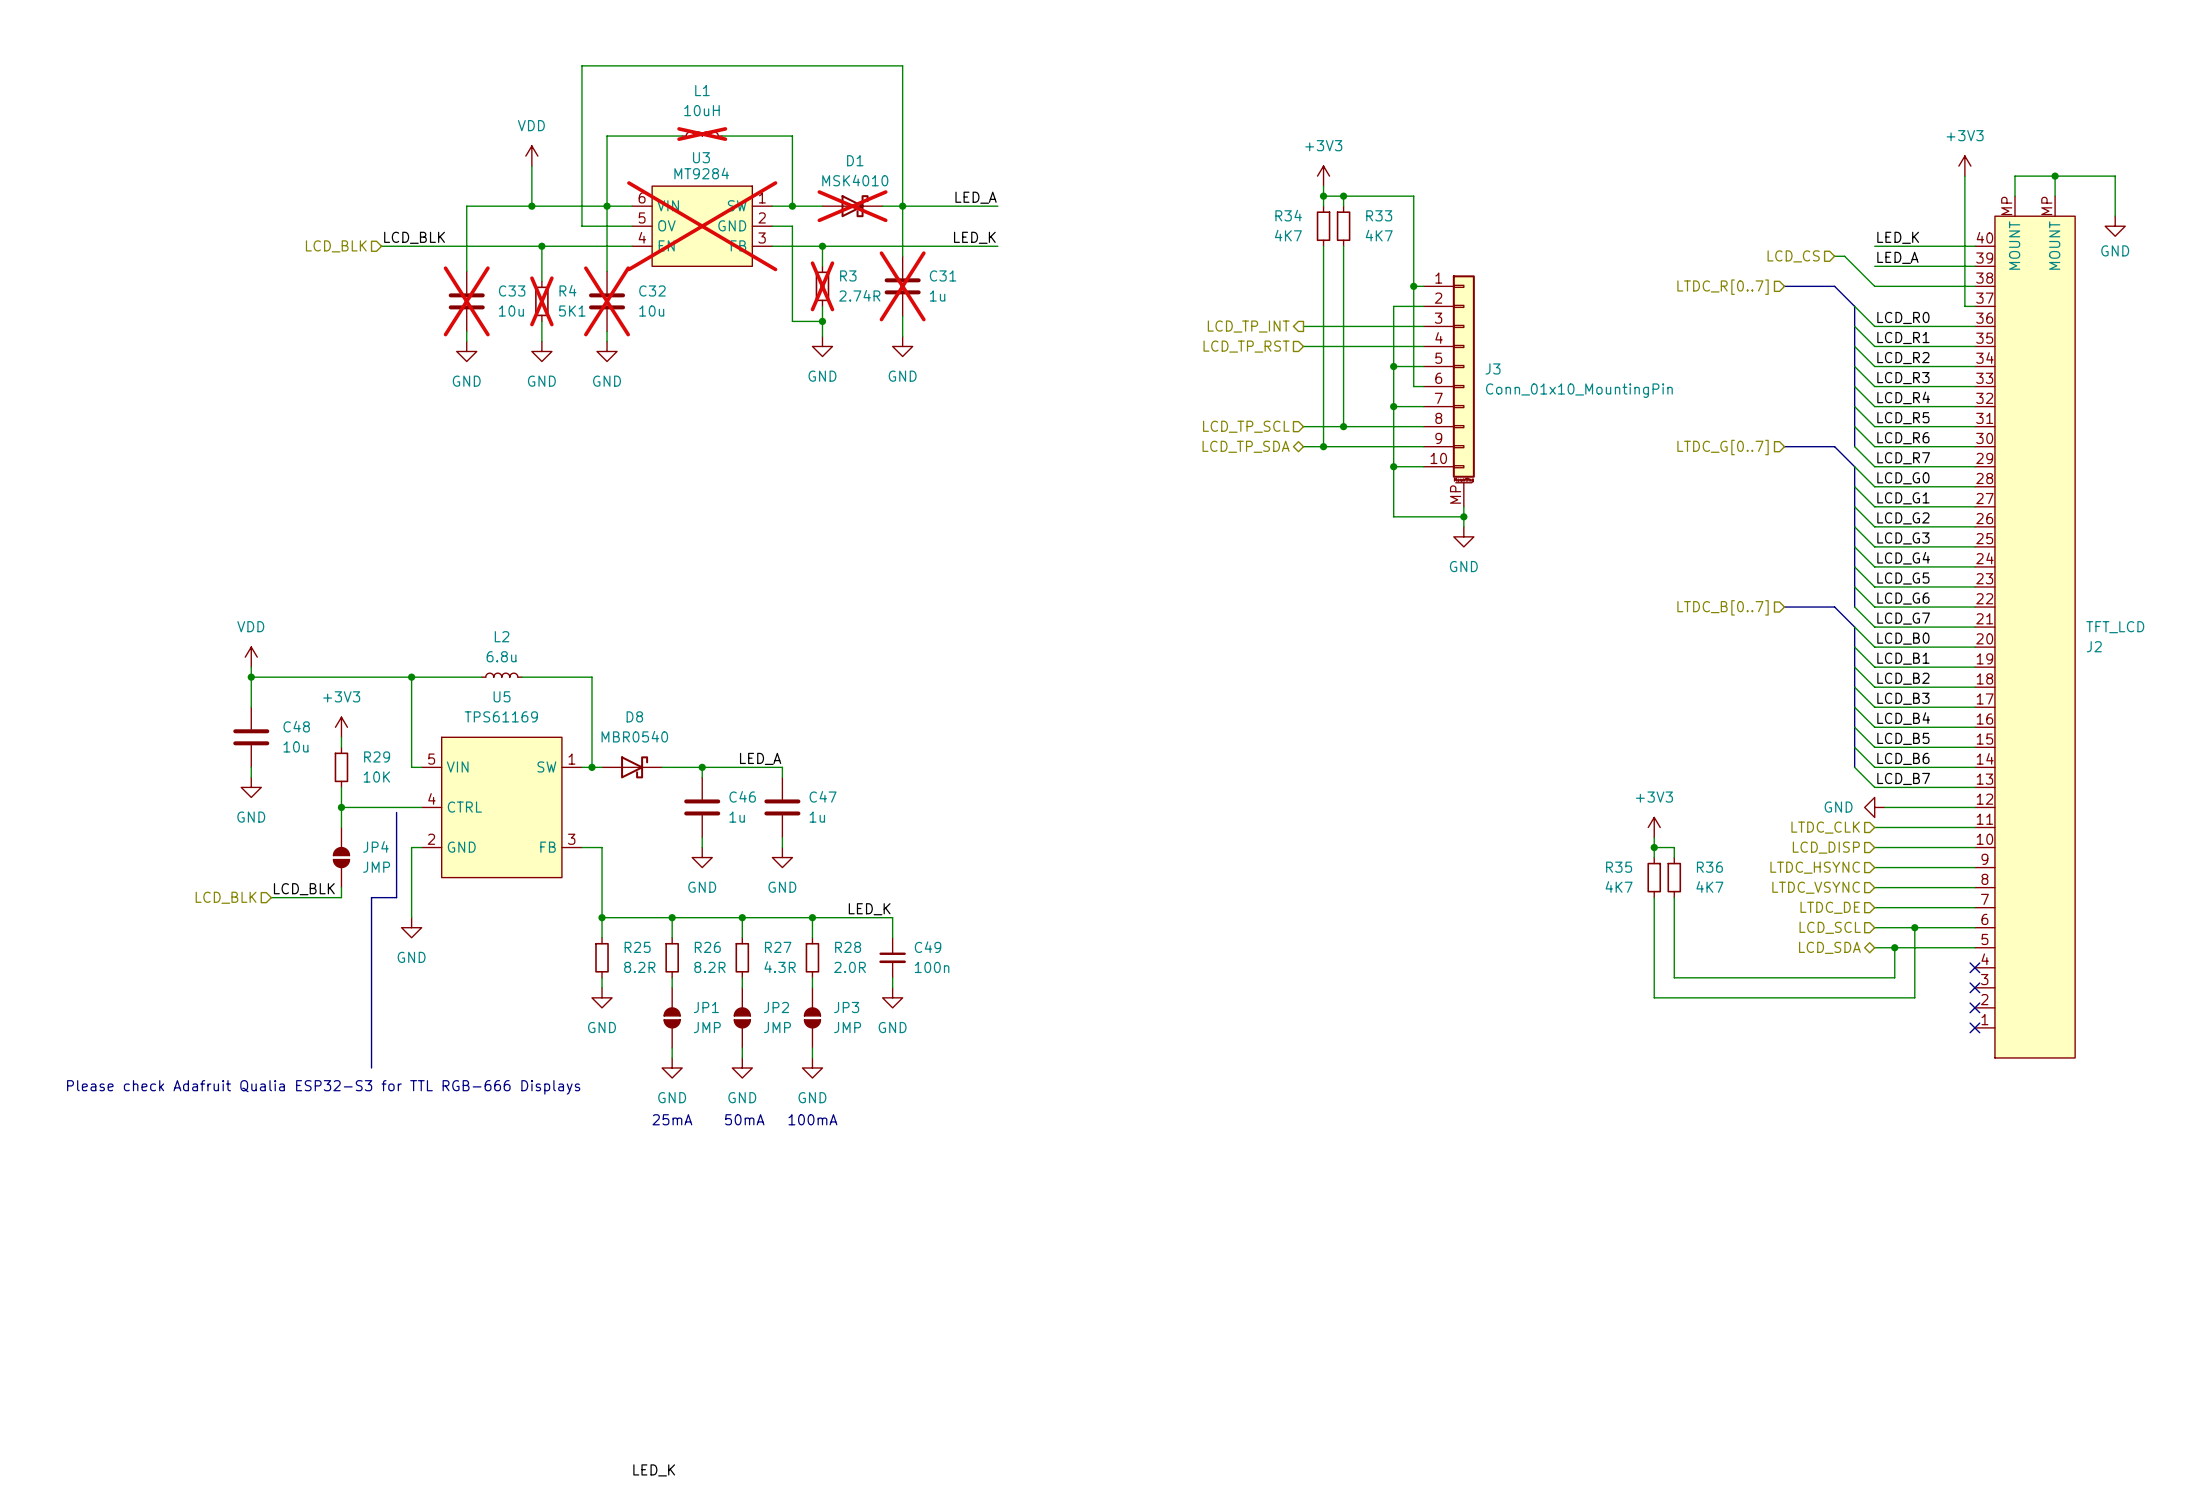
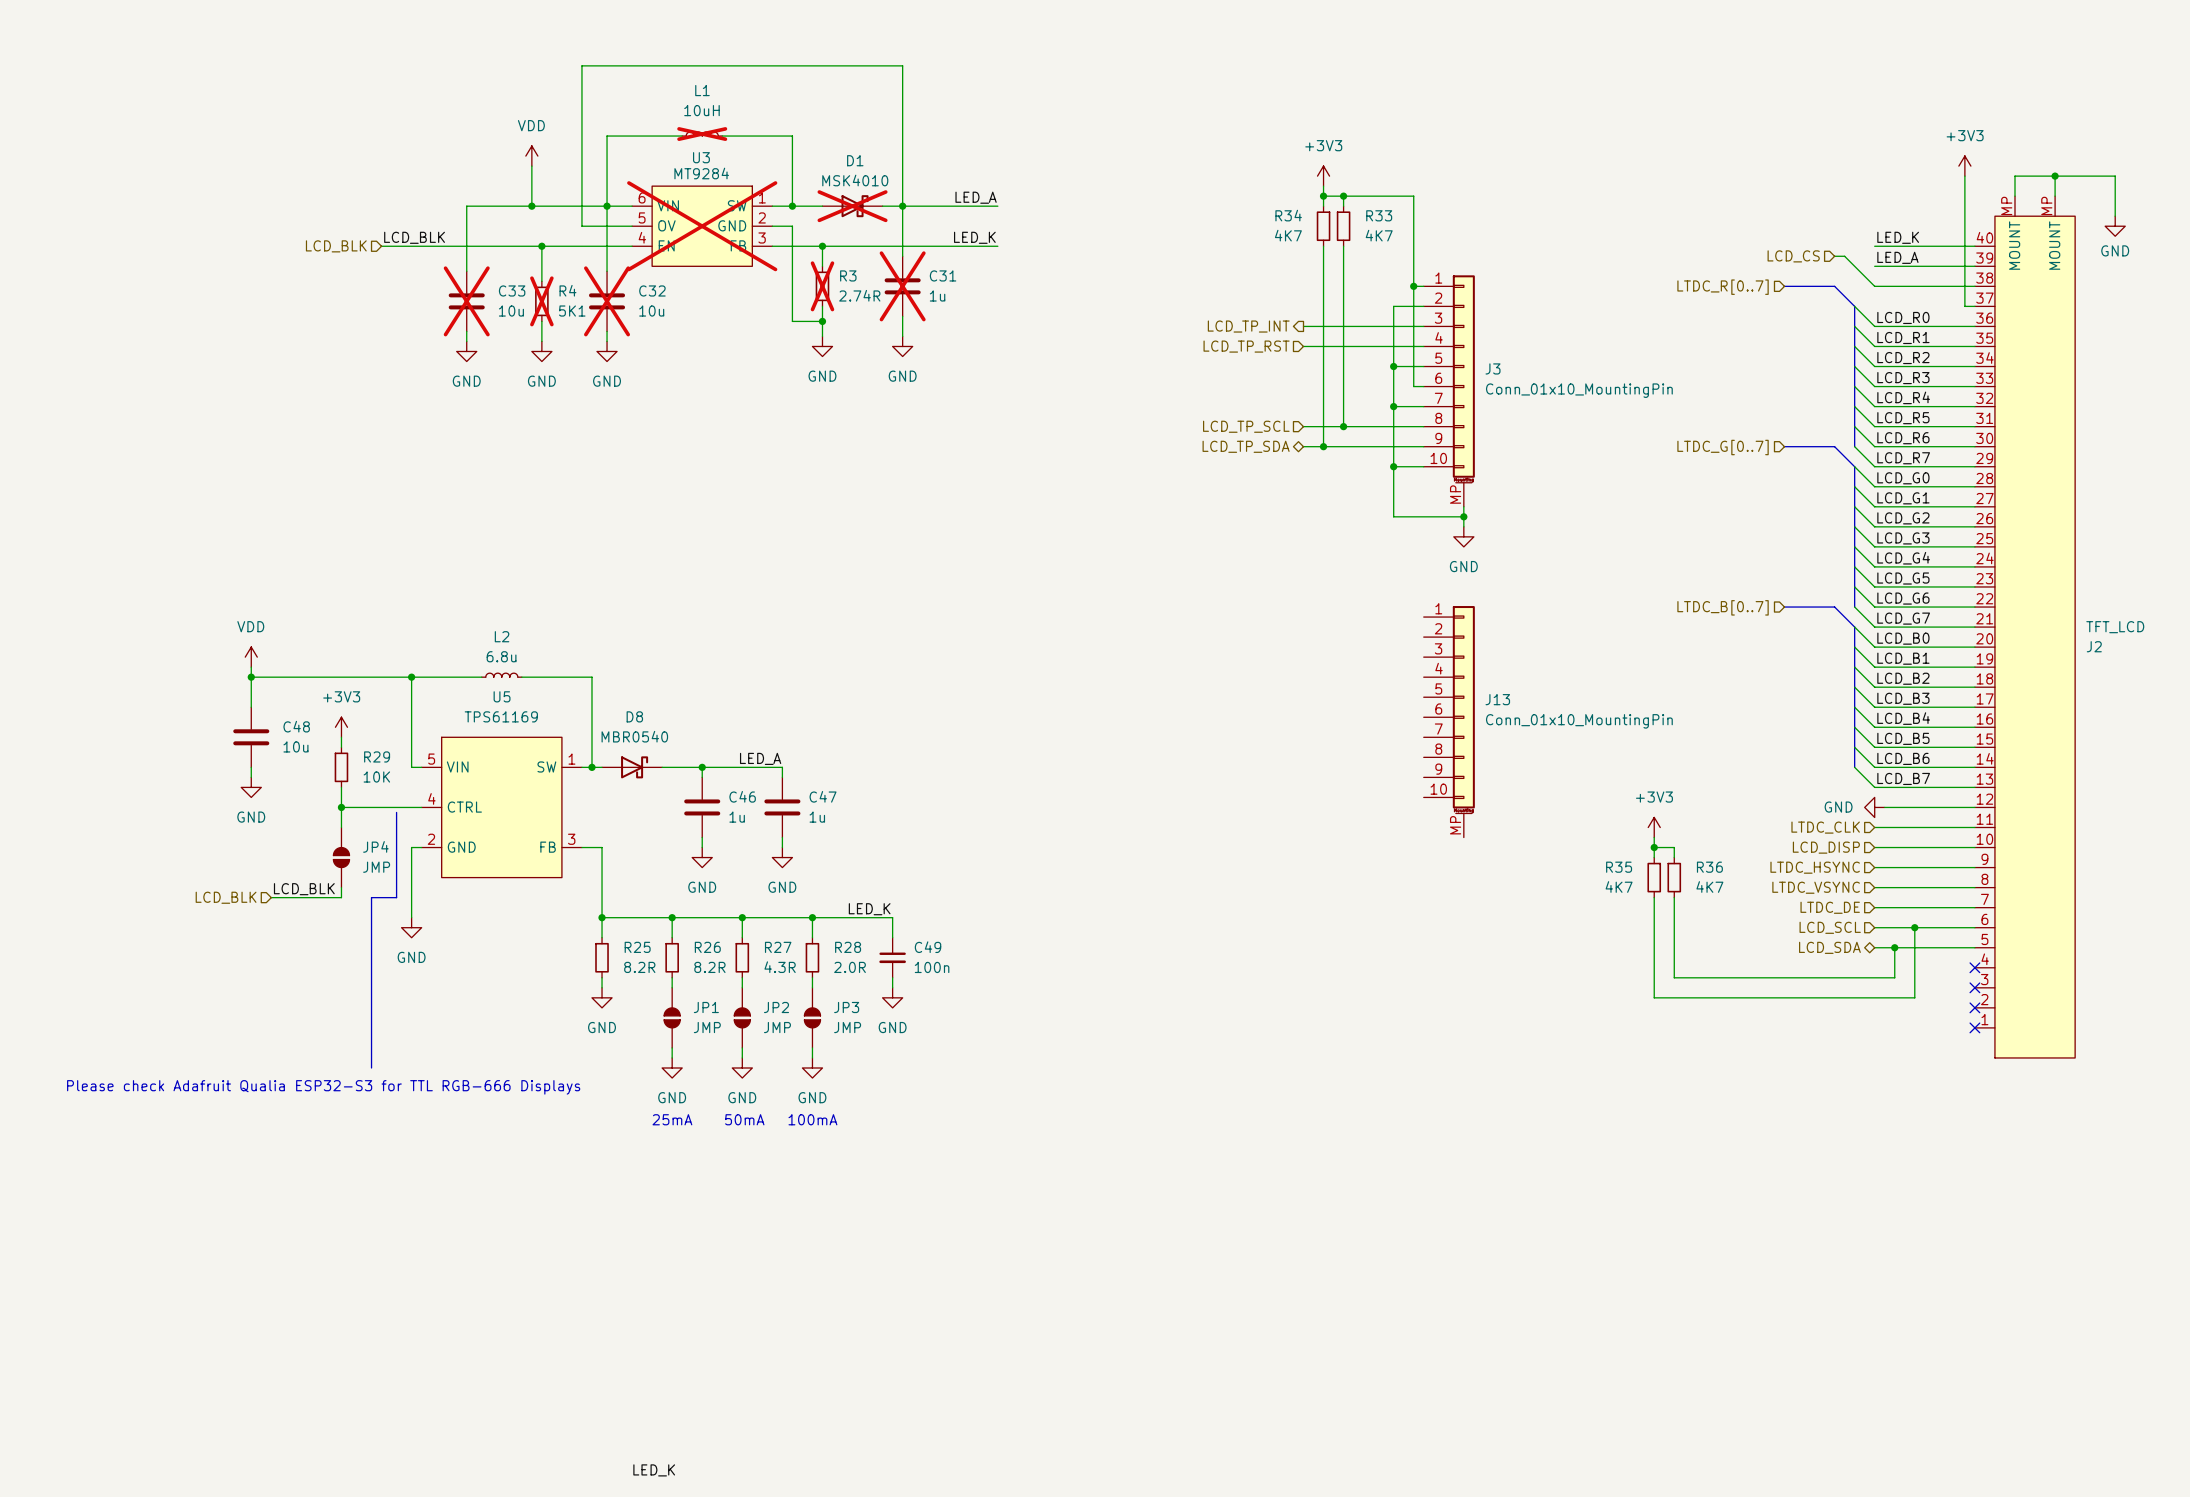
J13: none -> Conn_01x10_MountingPin (1449, 721)

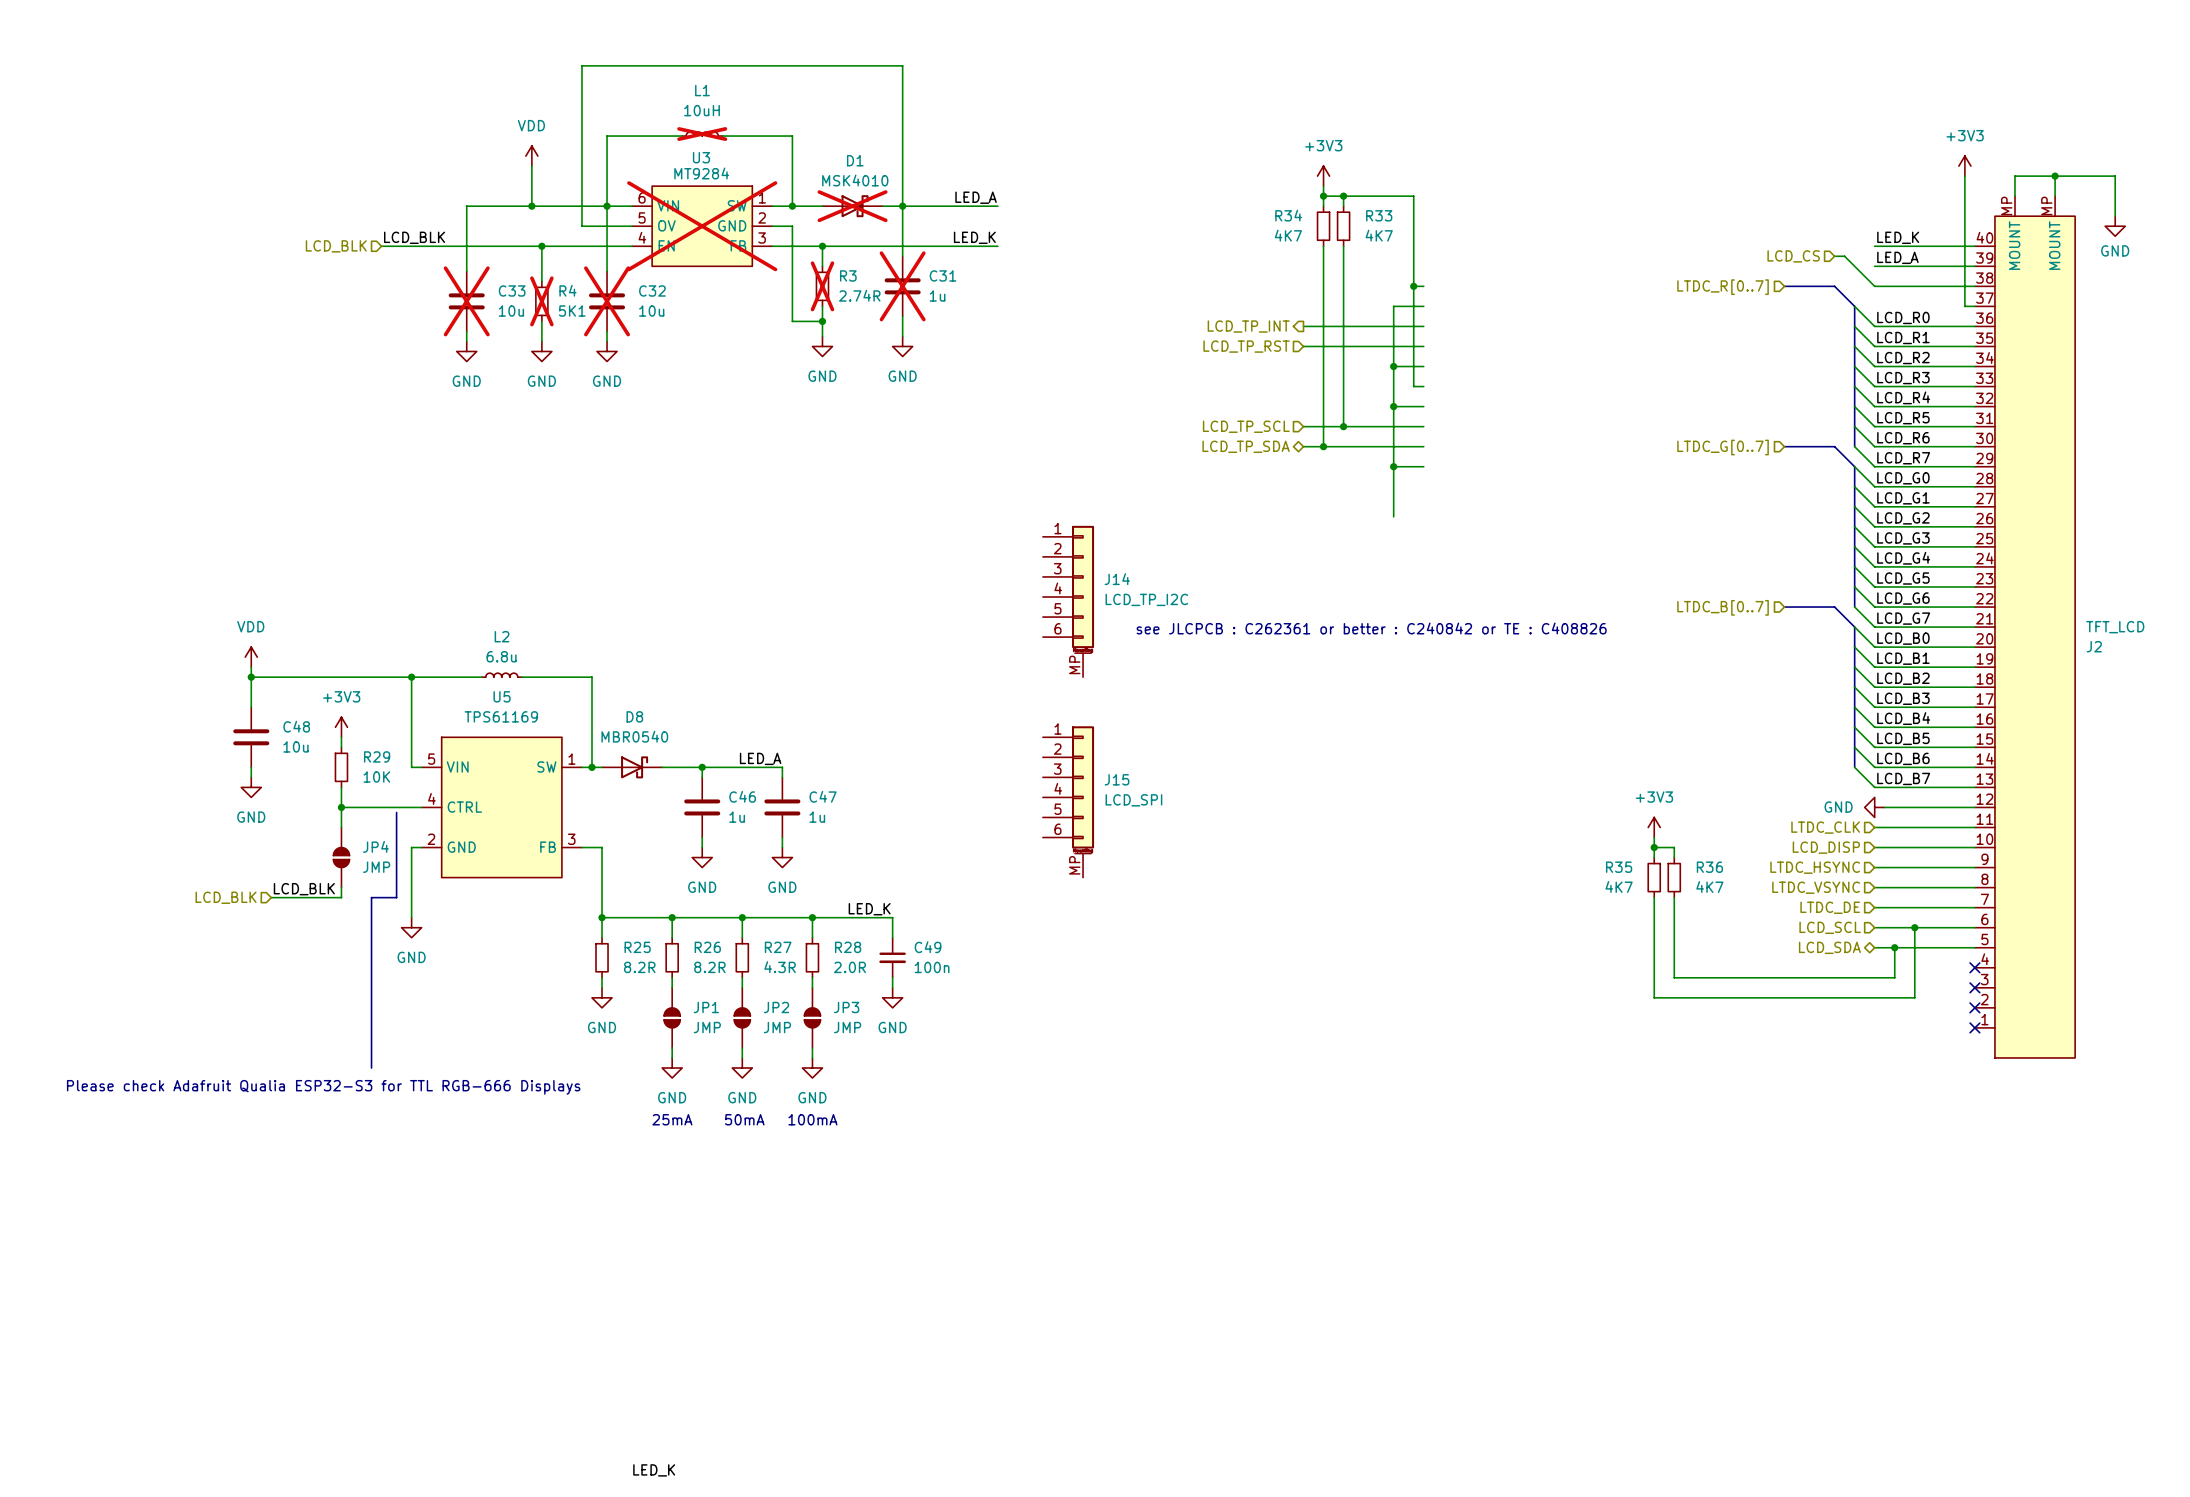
J3: Conn_01x10_MountingPin (1449, 391) -> none
wire: (1463, 506) (1463, 526) -> none
wire: (1393, 516) (1463, 516) -> none
junction: (1463, 516) -> none
power symbol: GND (1463, 536) -> none
J14: none -> LCD_TP_I2C (1068, 601)
text: none -> see JLCPCB : C262361 or better : C240842 or TE : C408826 (1371, 628)
J13: Conn_01x10_MountingPin (1449, 721) -> none
J15: none -> LCD_SPI (1068, 801)

